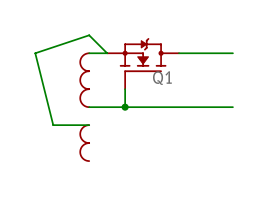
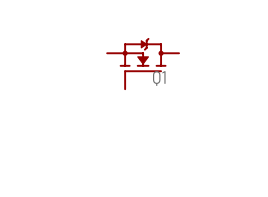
line: (89, 53) (82, 55) (80, 62) (82, 68) (89, 71) (83, 73) (80, 77) (82, 85) (89, 89) (82, 92) (80, 100) (83, 105) (89, 107) -> none
wire: (89, 53) (107, 53) (89, 35) (35, 53) (53, 125) (89, 125) -> none
wire: (179, 53) (232, 53) -> none
wire: (125, 89) (125, 107) -> none
wire: (89, 107) (232, 107) -> none
junction: (125, 107) -> none
line: (89, 125) (82, 127) (80, 134) (82, 140) (89, 143) (82, 146) (80, 154) (83, 159) (89, 161) -> none

